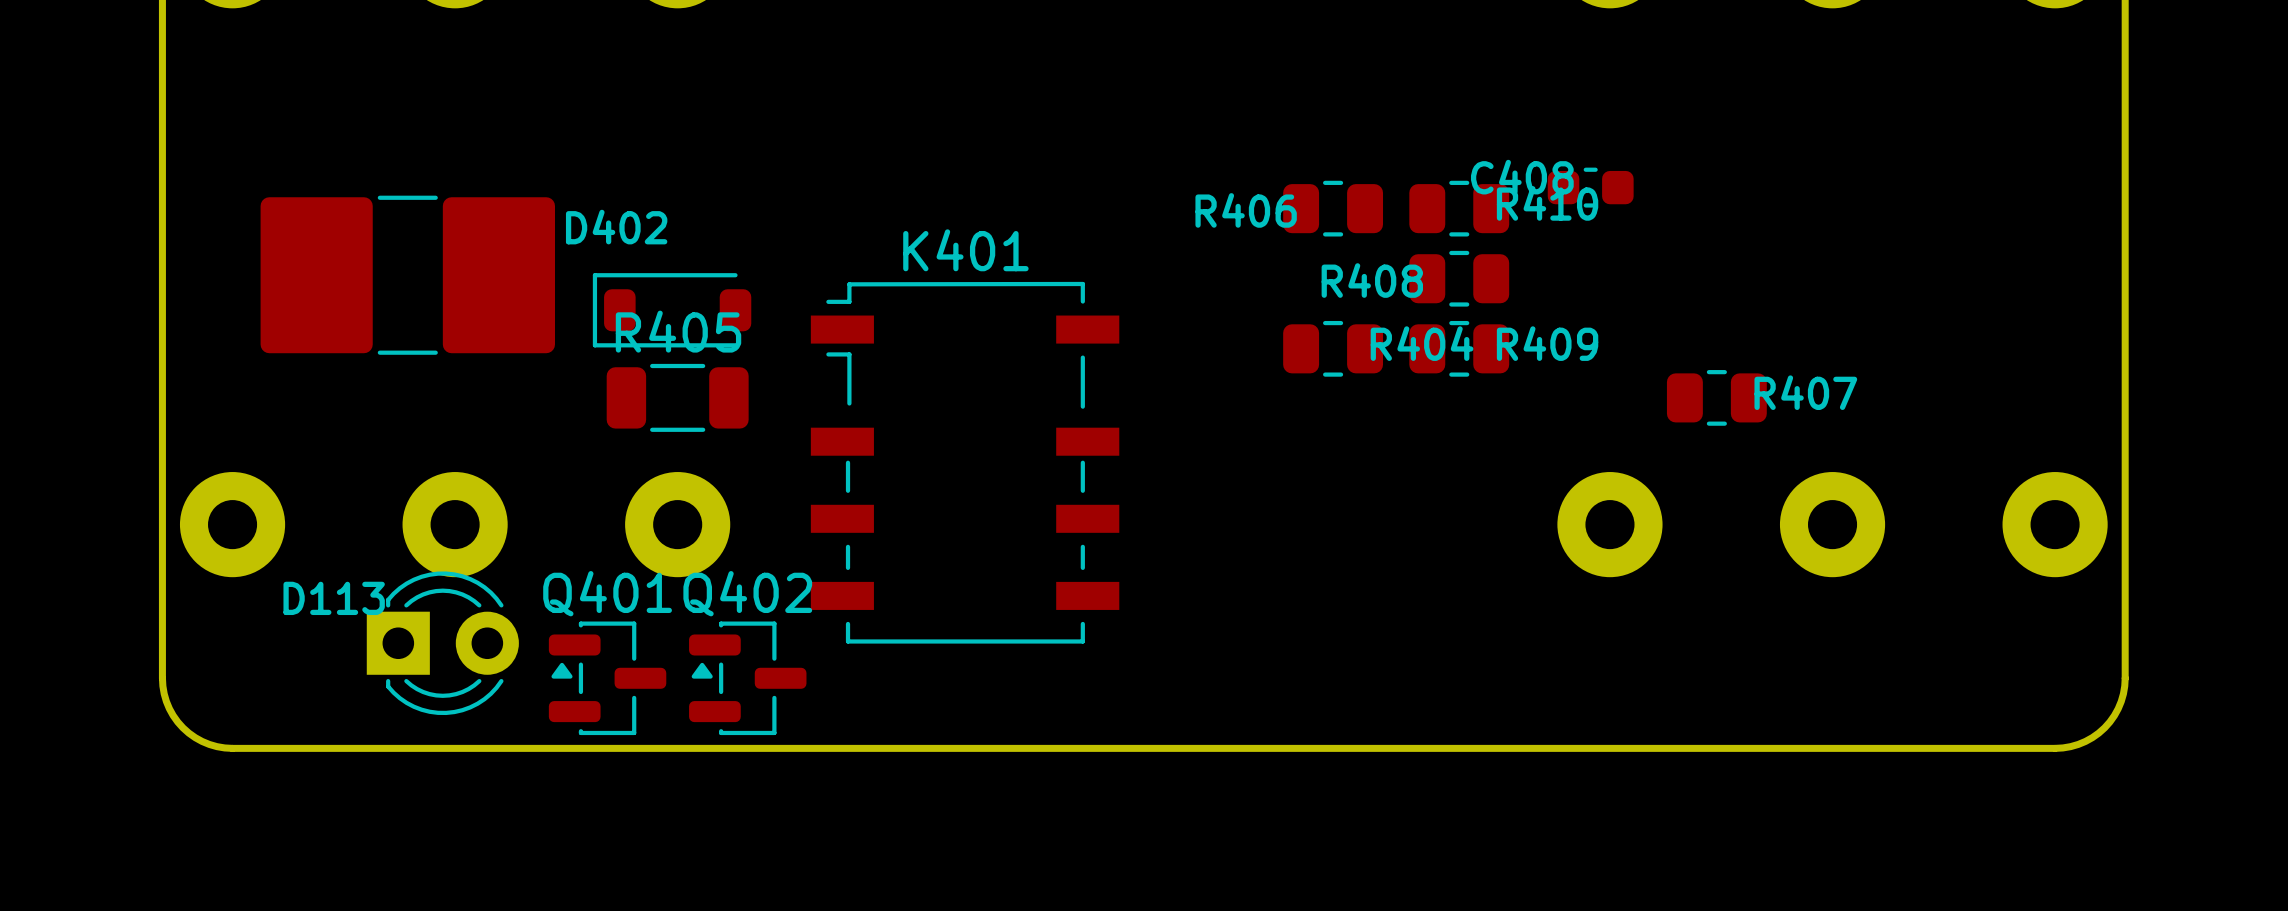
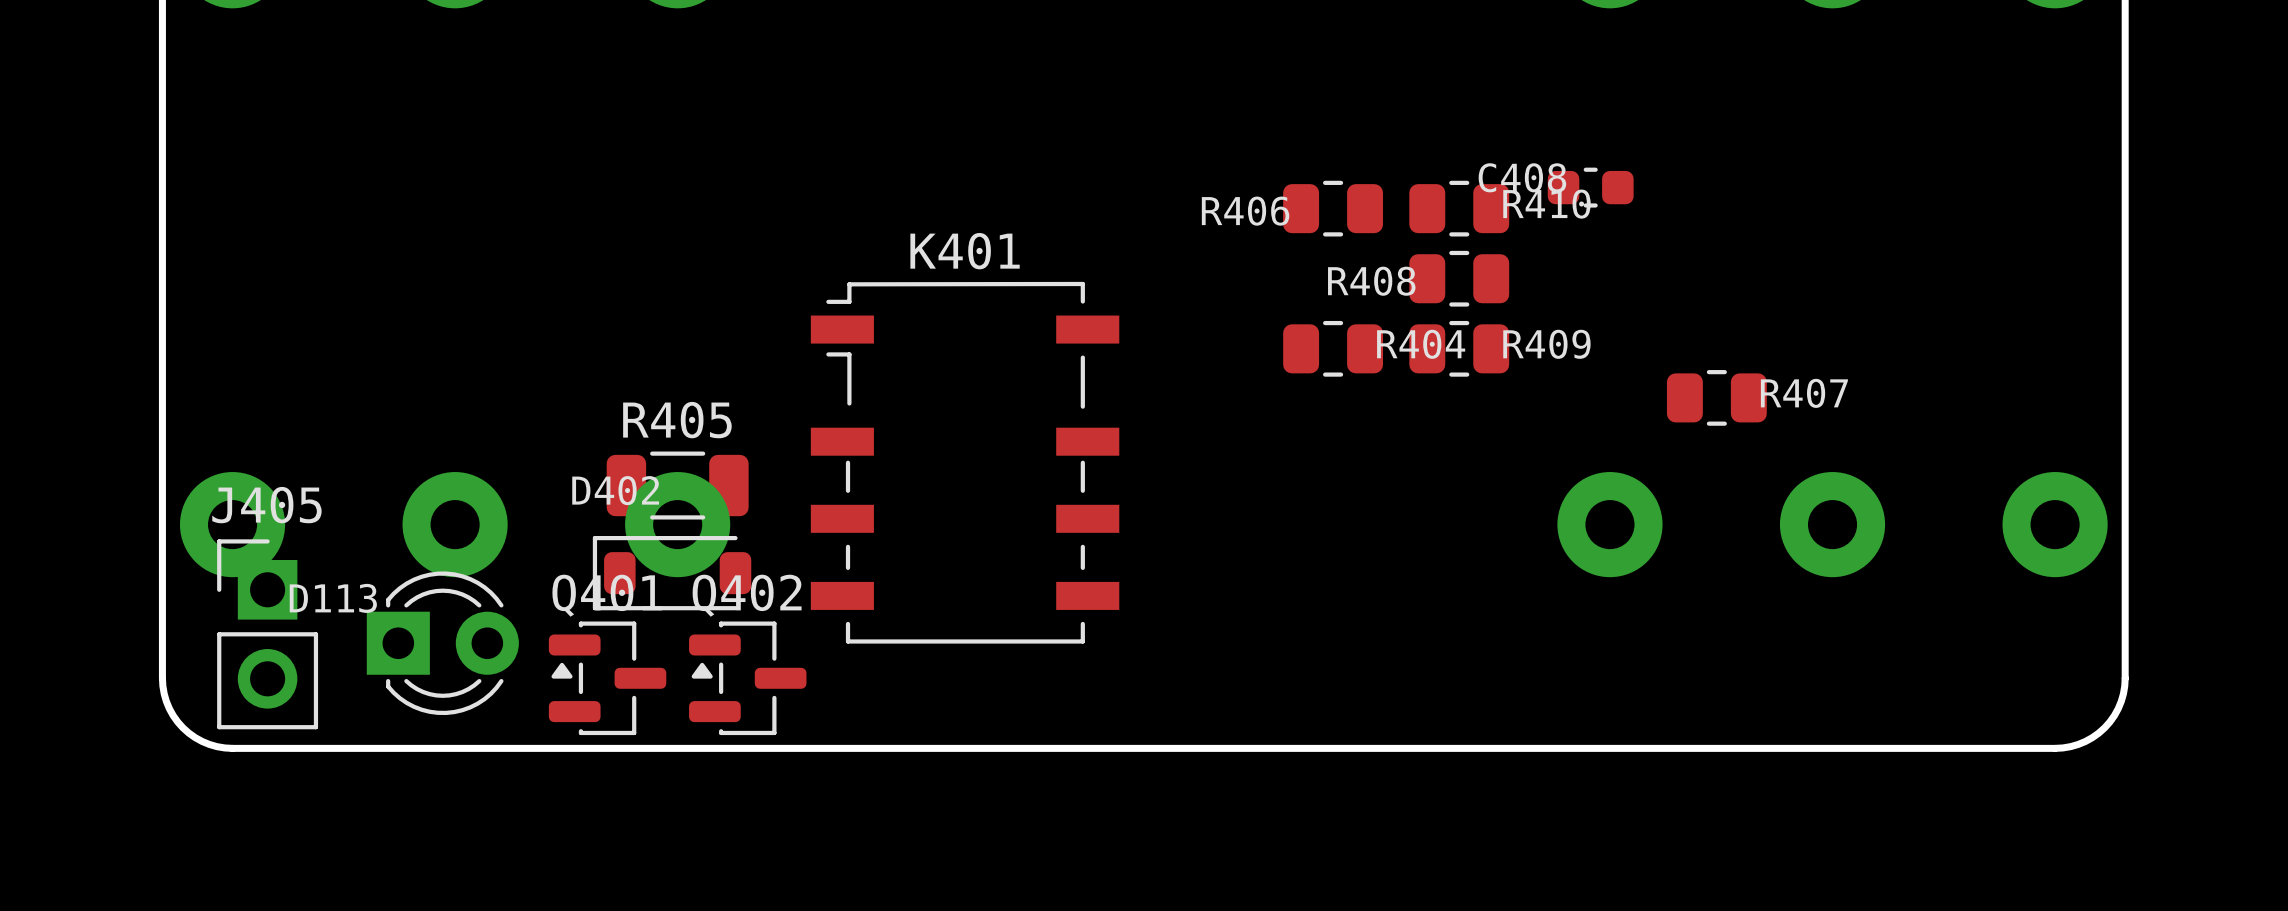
part: (407, 275) -> none
D402 position: (672, 310) -> (672, 573)
R405 position: (677, 397) -> (677, 485)
J405: none -> (267, 634)

